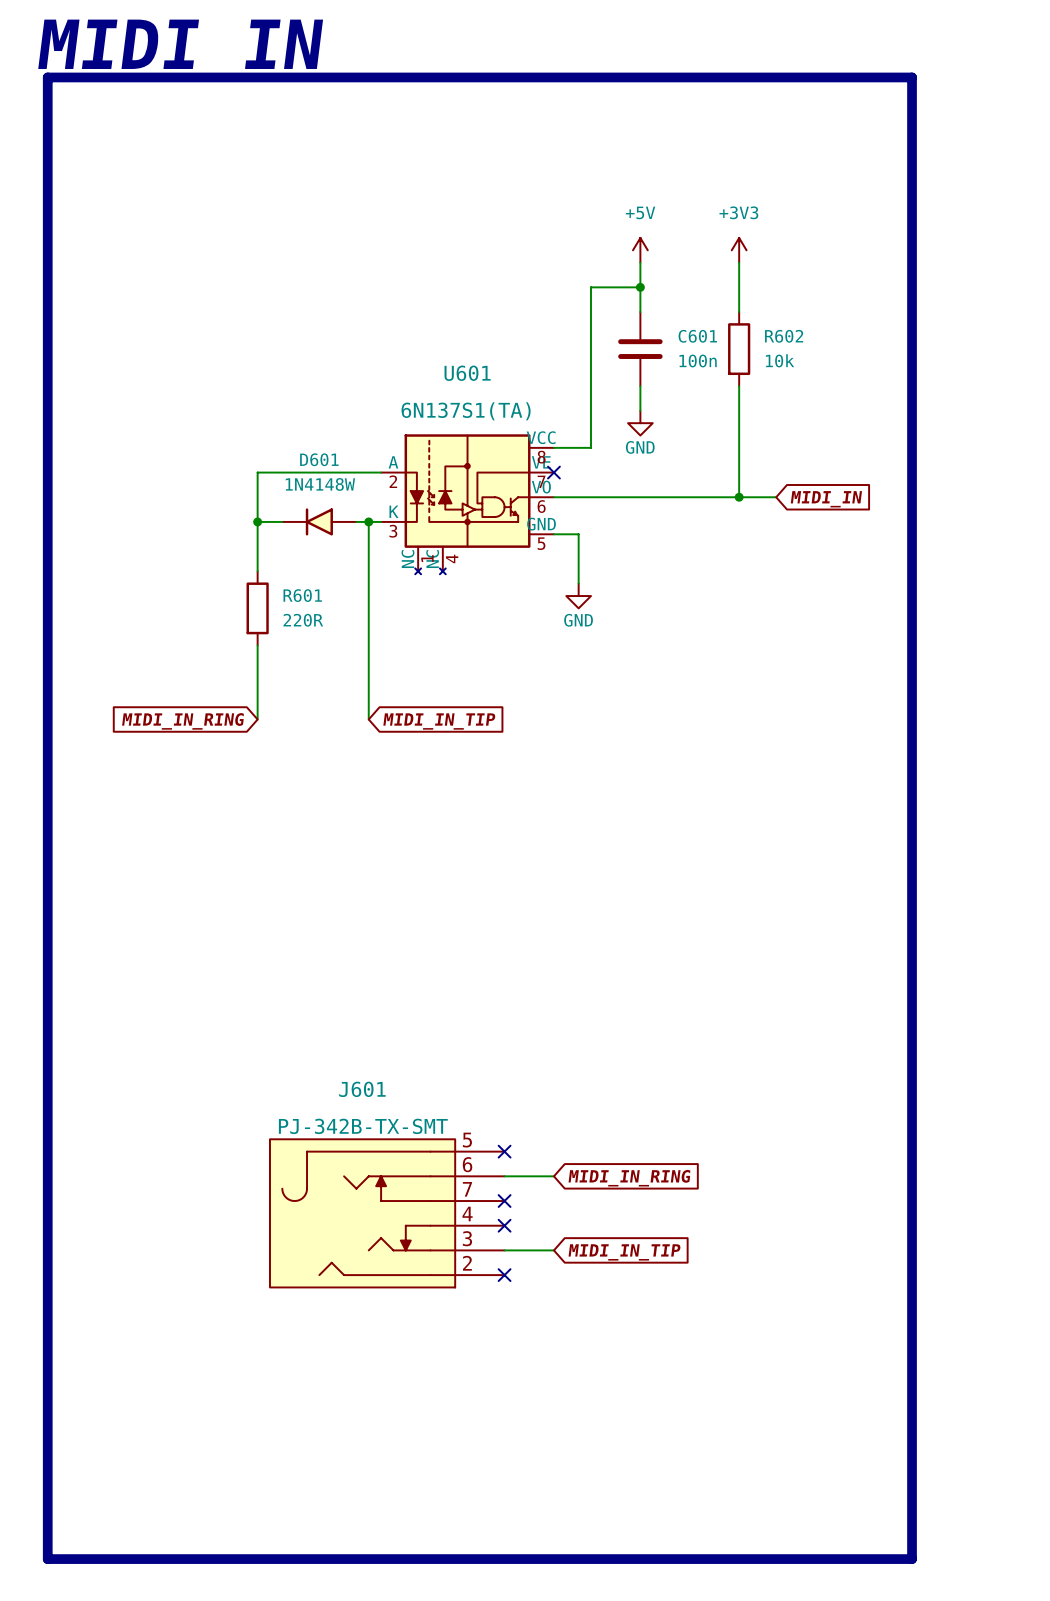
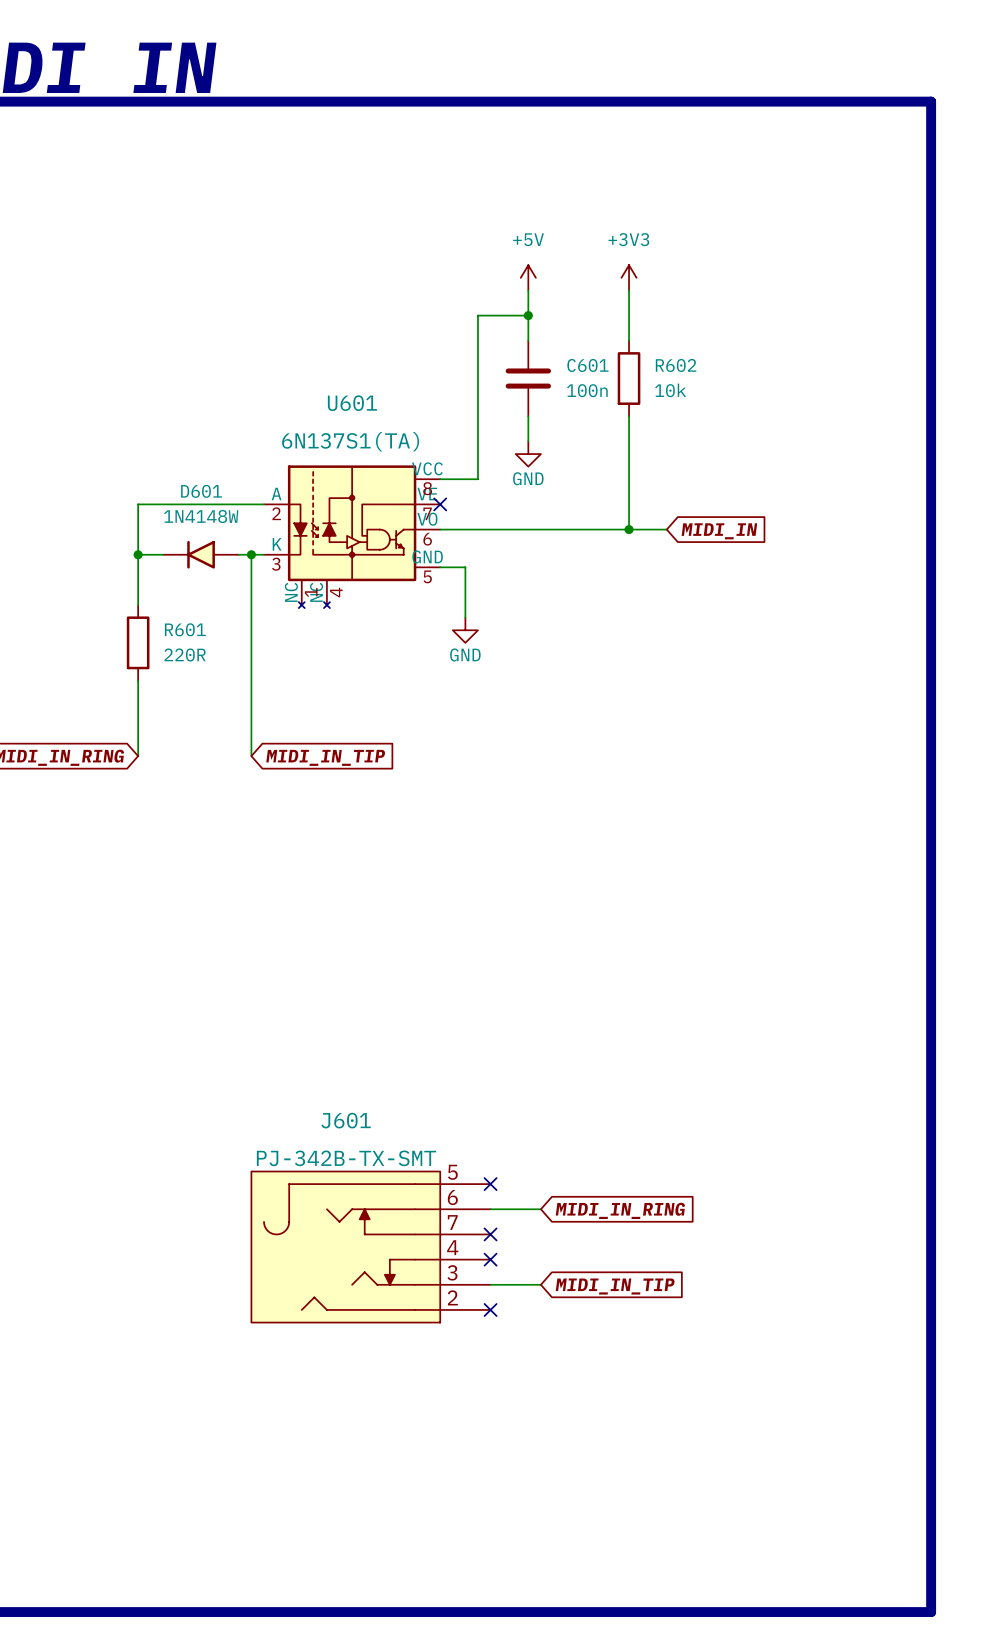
line: (912, 77) (912, 1559) -> (805, 101) (931, 101) (931, 1612) (805, 1612)
no-connect mark: none -> (490, 1184)
no-connect mark: (504, 1151) -> none
global label position: MIDI_IN_RING (629, 1178) -> MIDI_IN_RING (620, 1210)
no-connect mark: none -> (490, 1234)
no-connect mark: (504, 1201) -> none
J601 position: (387, 1213) -> (370, 1247)
no-connect mark: none -> (490, 1259)
no-connect mark: (504, 1225) -> none
global label position: MIDI_IN_TIP (624, 1252) -> MIDI_IN_TIP (615, 1286)
no-connect mark: none -> (490, 1309)
no-connect mark: (504, 1275) -> none

